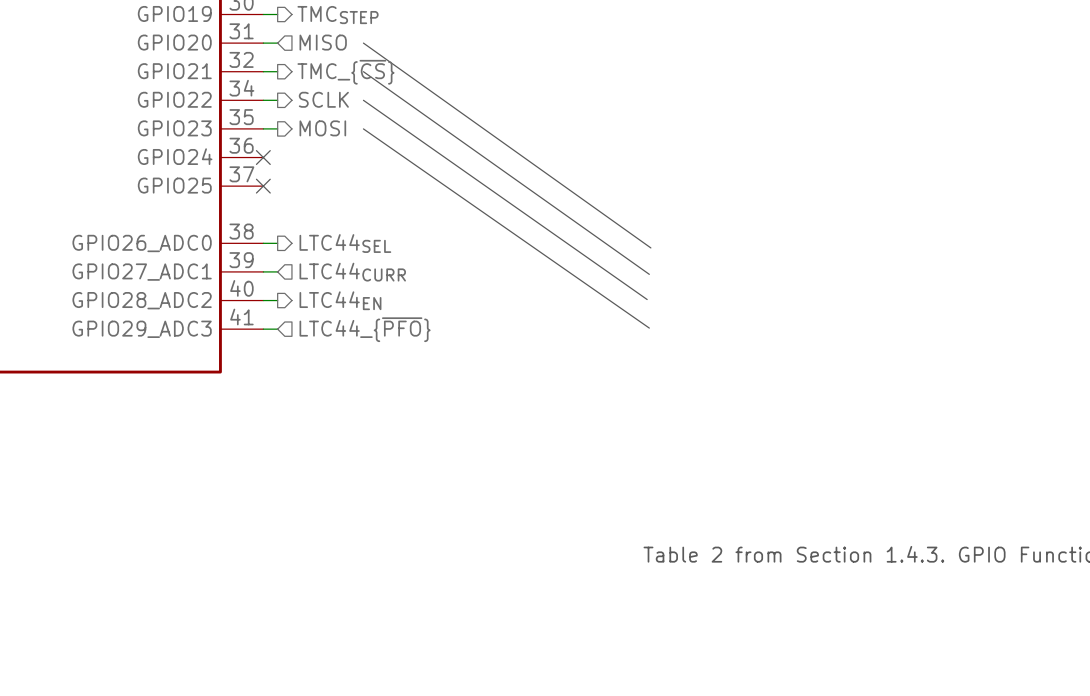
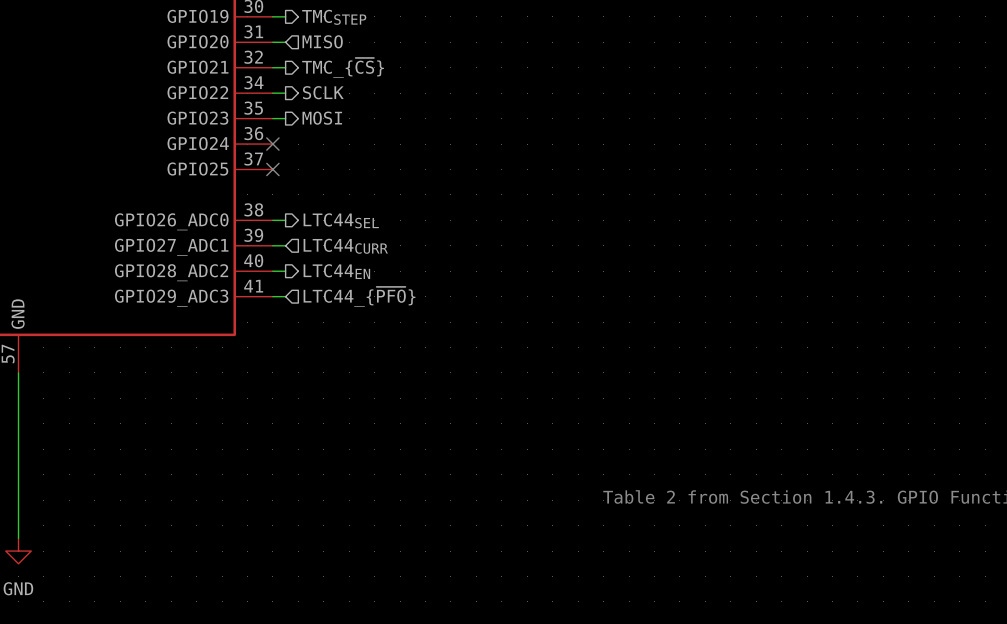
line: (363, 43) (650, 247) -> none
line: (363, 71) (649, 274) -> none
line: (363, 100) (647, 299) -> none
line: (363, 128) (649, 328) -> none

